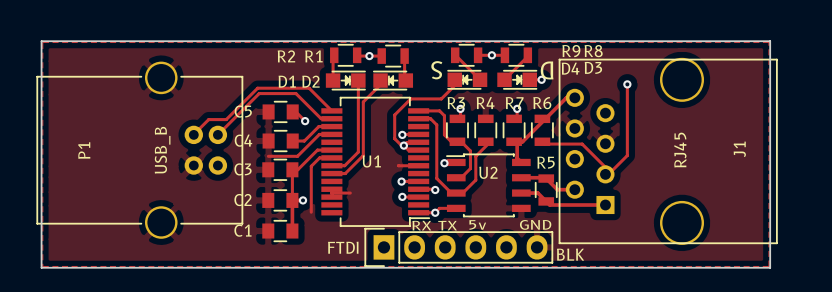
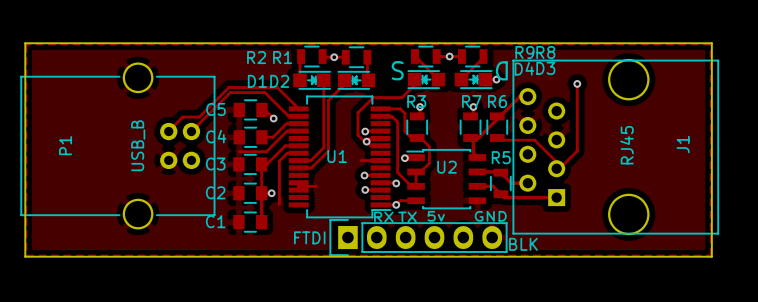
R4: (485, 130) -> none
track: (490, 141) (475, 156) (475, 180) (462, 193) -> none
track: none -> (416, 171) (416, 186)

